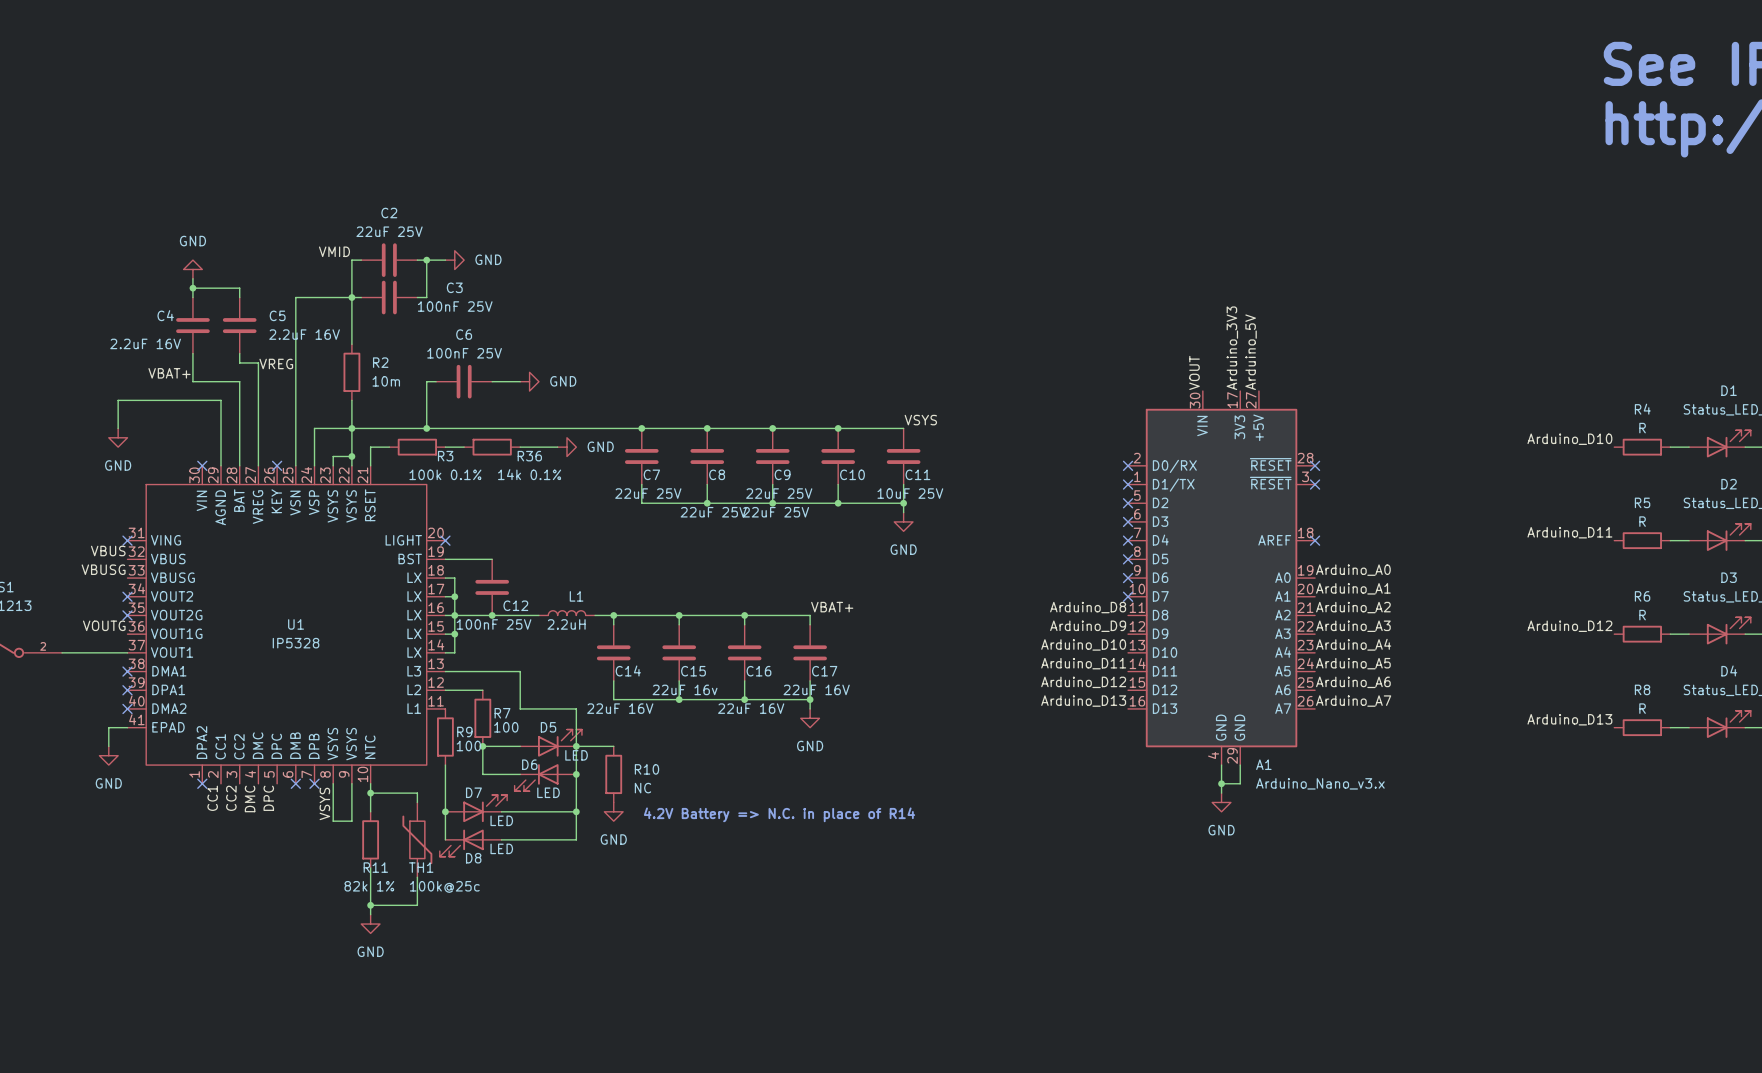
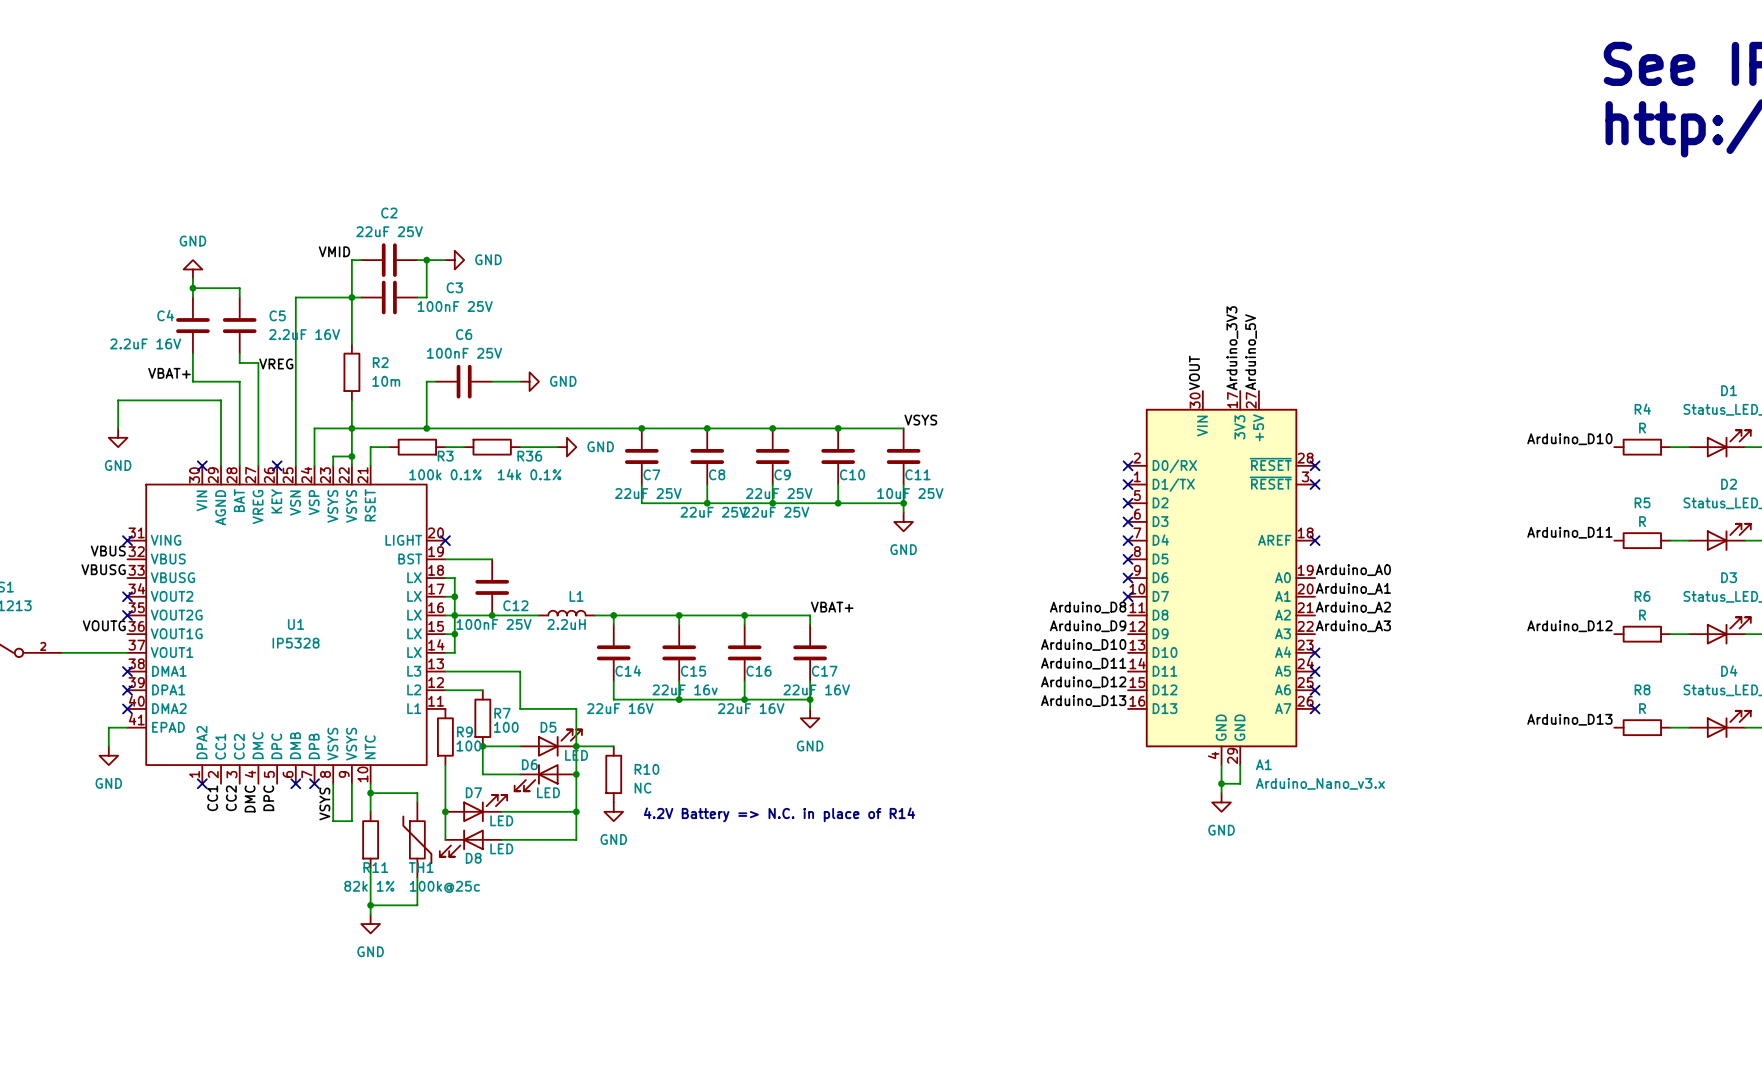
label: Arduino_A4 (1353, 644) -> none
no-connect mark: none -> (1315, 652)
label: Arduino_A5 (1353, 663) -> none
no-connect mark: none -> (1315, 671)
label: Arduino_A6 (1353, 682) -> none
no-connect mark: none -> (1315, 690)
label: Arduino_A7 (1353, 701) -> none
no-connect mark: none -> (1315, 708)

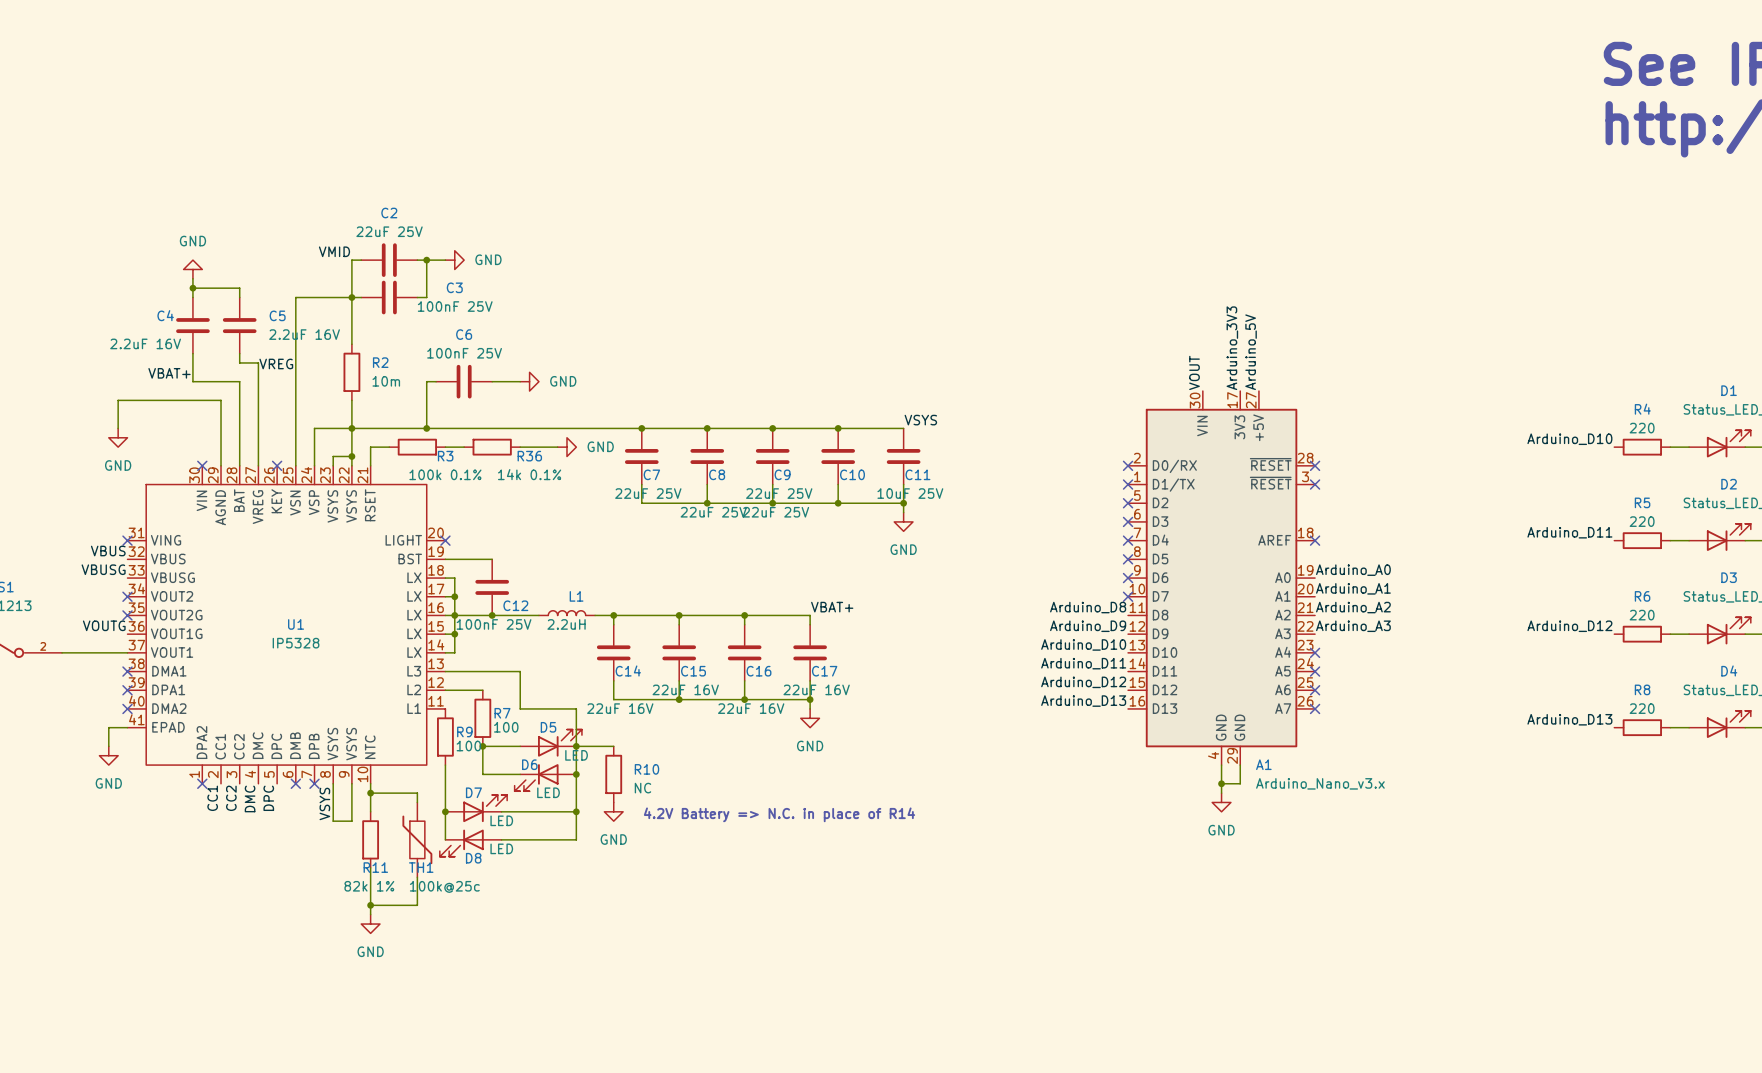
R4 value: R (1642, 428) -> 220 (1642, 428)
R5 value: R (1642, 521) -> 220 (1642, 521)
R6 value: R (1642, 615) -> 220 (1642, 615)
C15 value: 22uF 16v (685, 689) -> 22uF 16V (685, 689)
R8 value: R (1642, 708) -> 220 (1642, 708)

